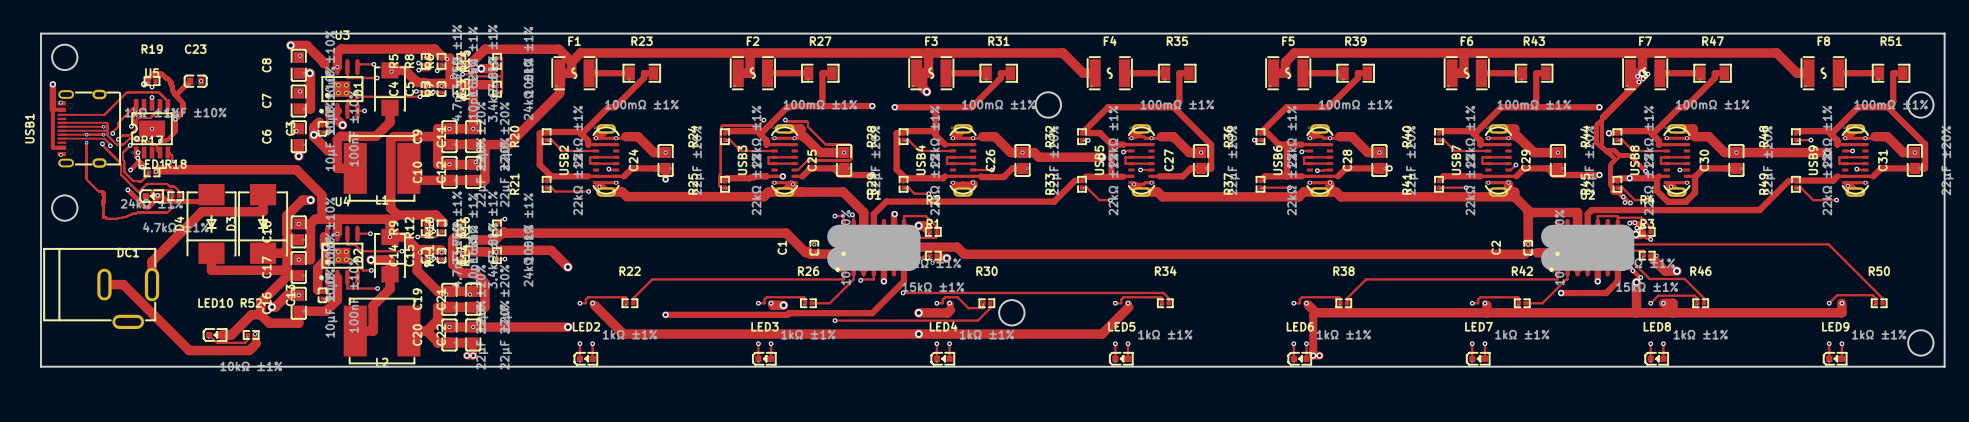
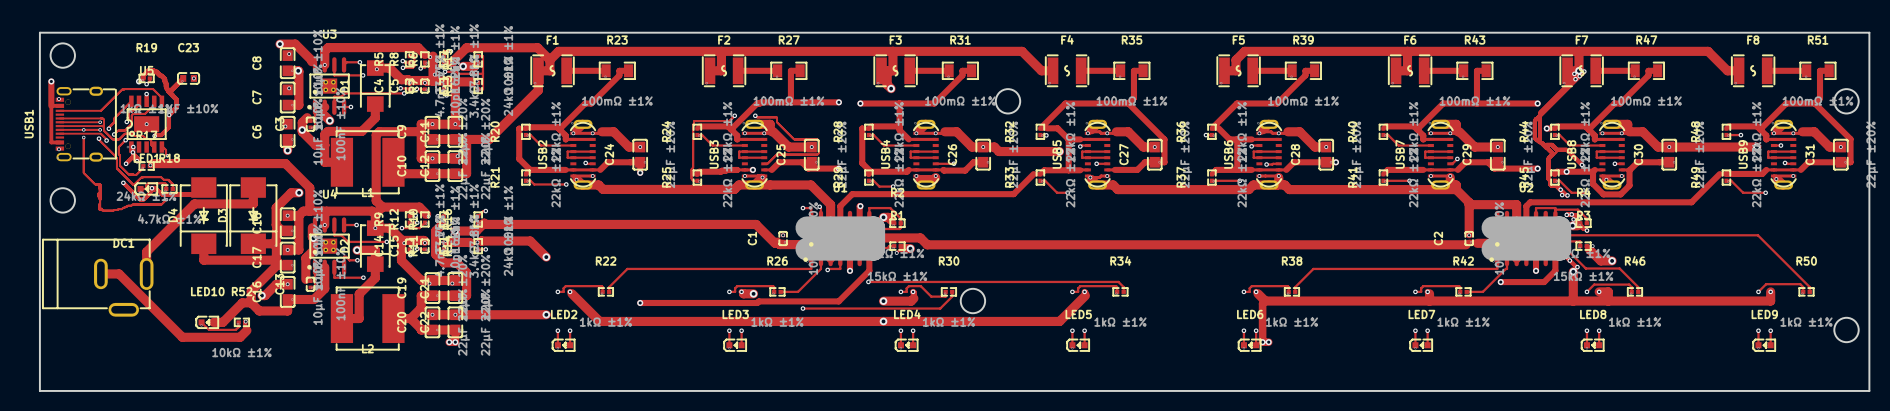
board edge: (40, 366) (1944, 366) -> (39, 352) (39, 390) (1869, 390) (1869, 352)

